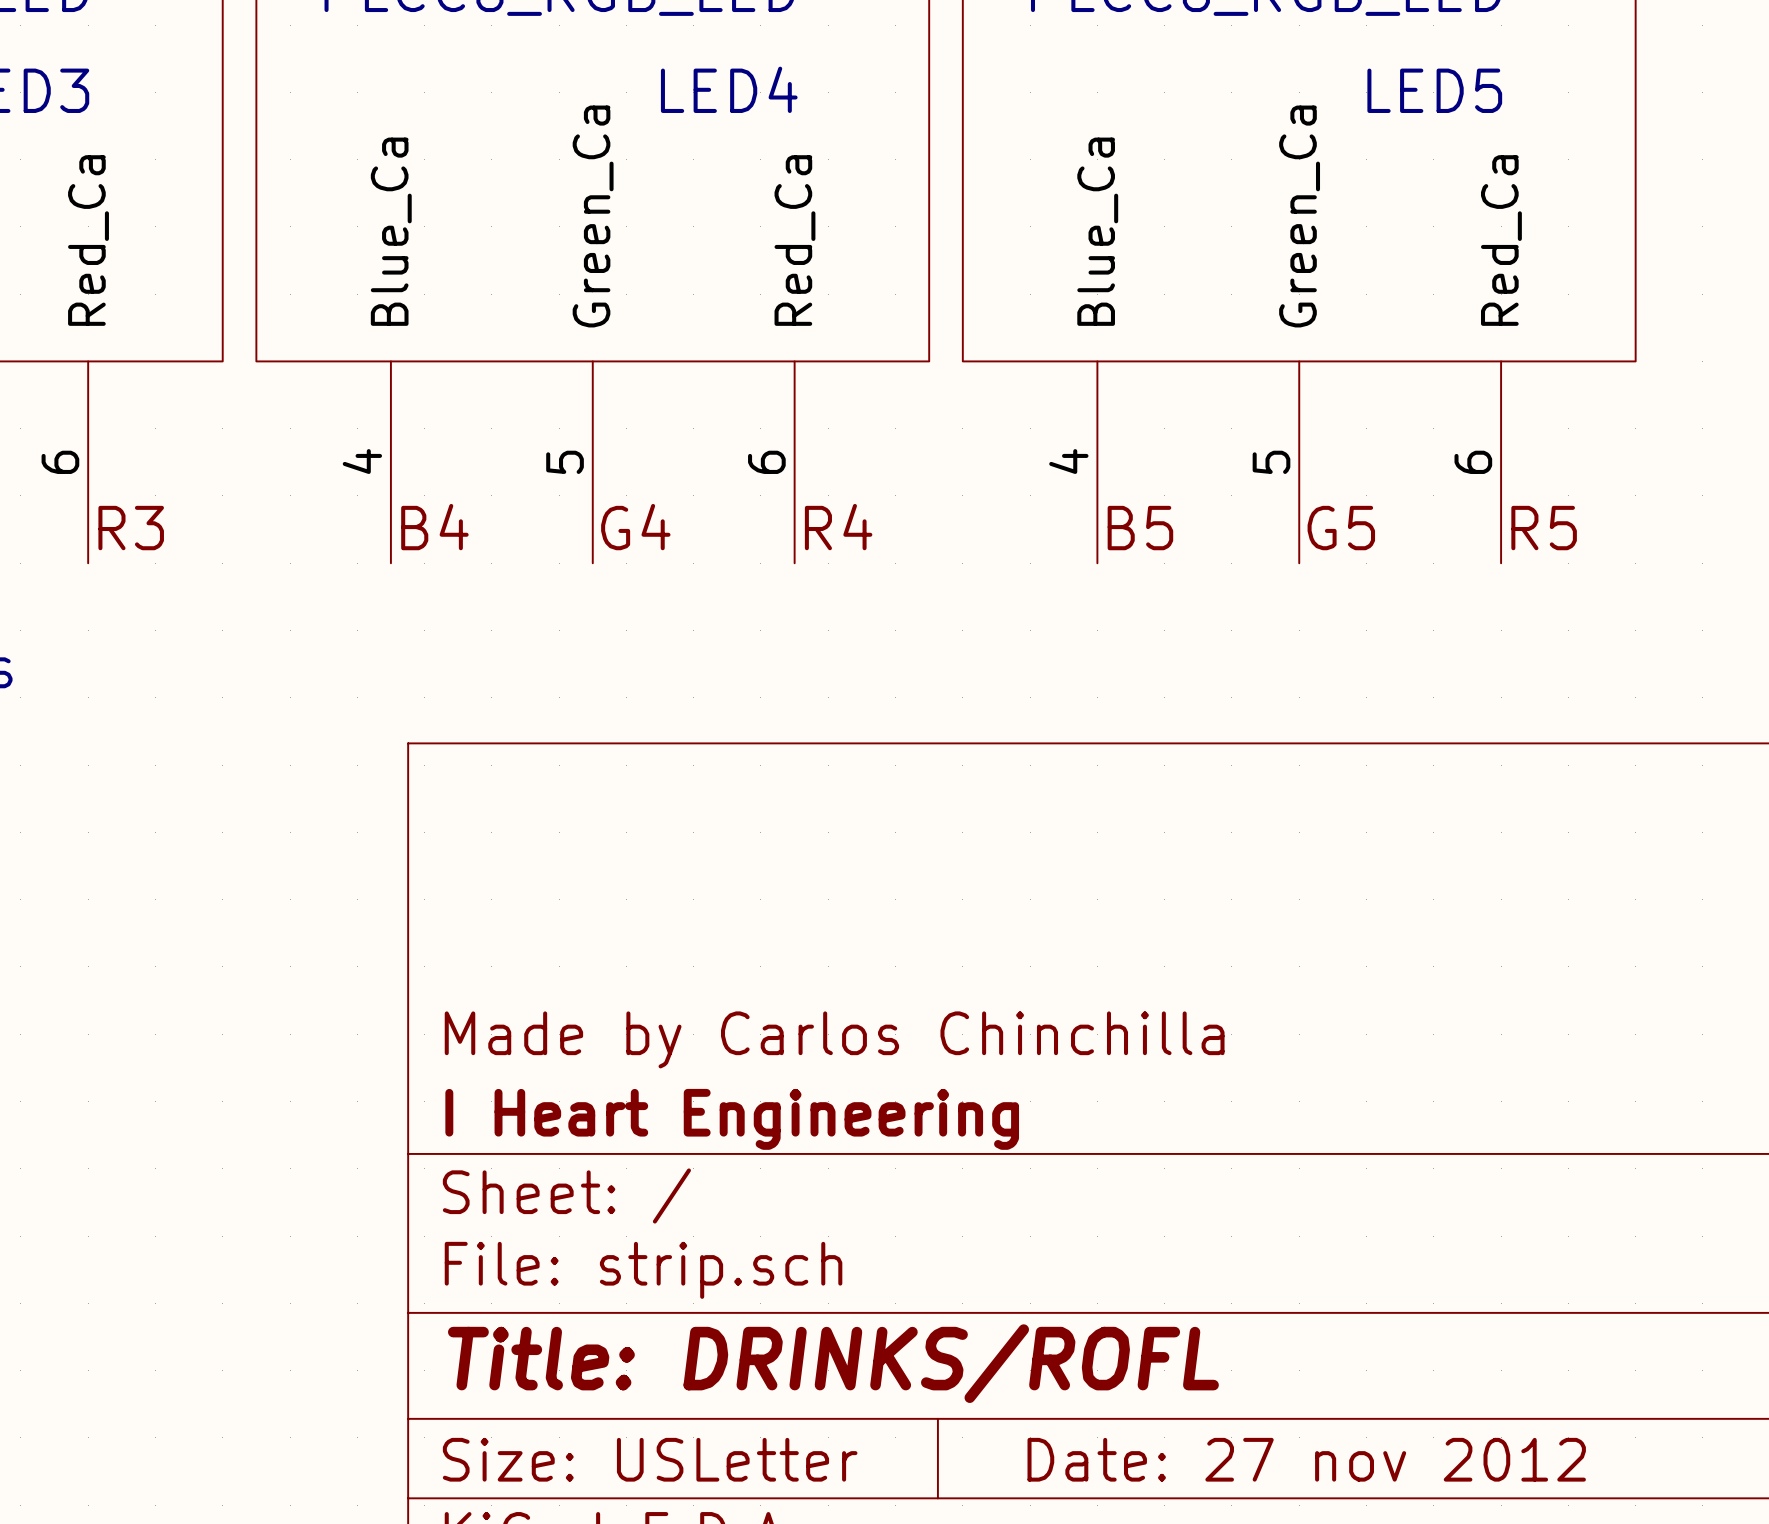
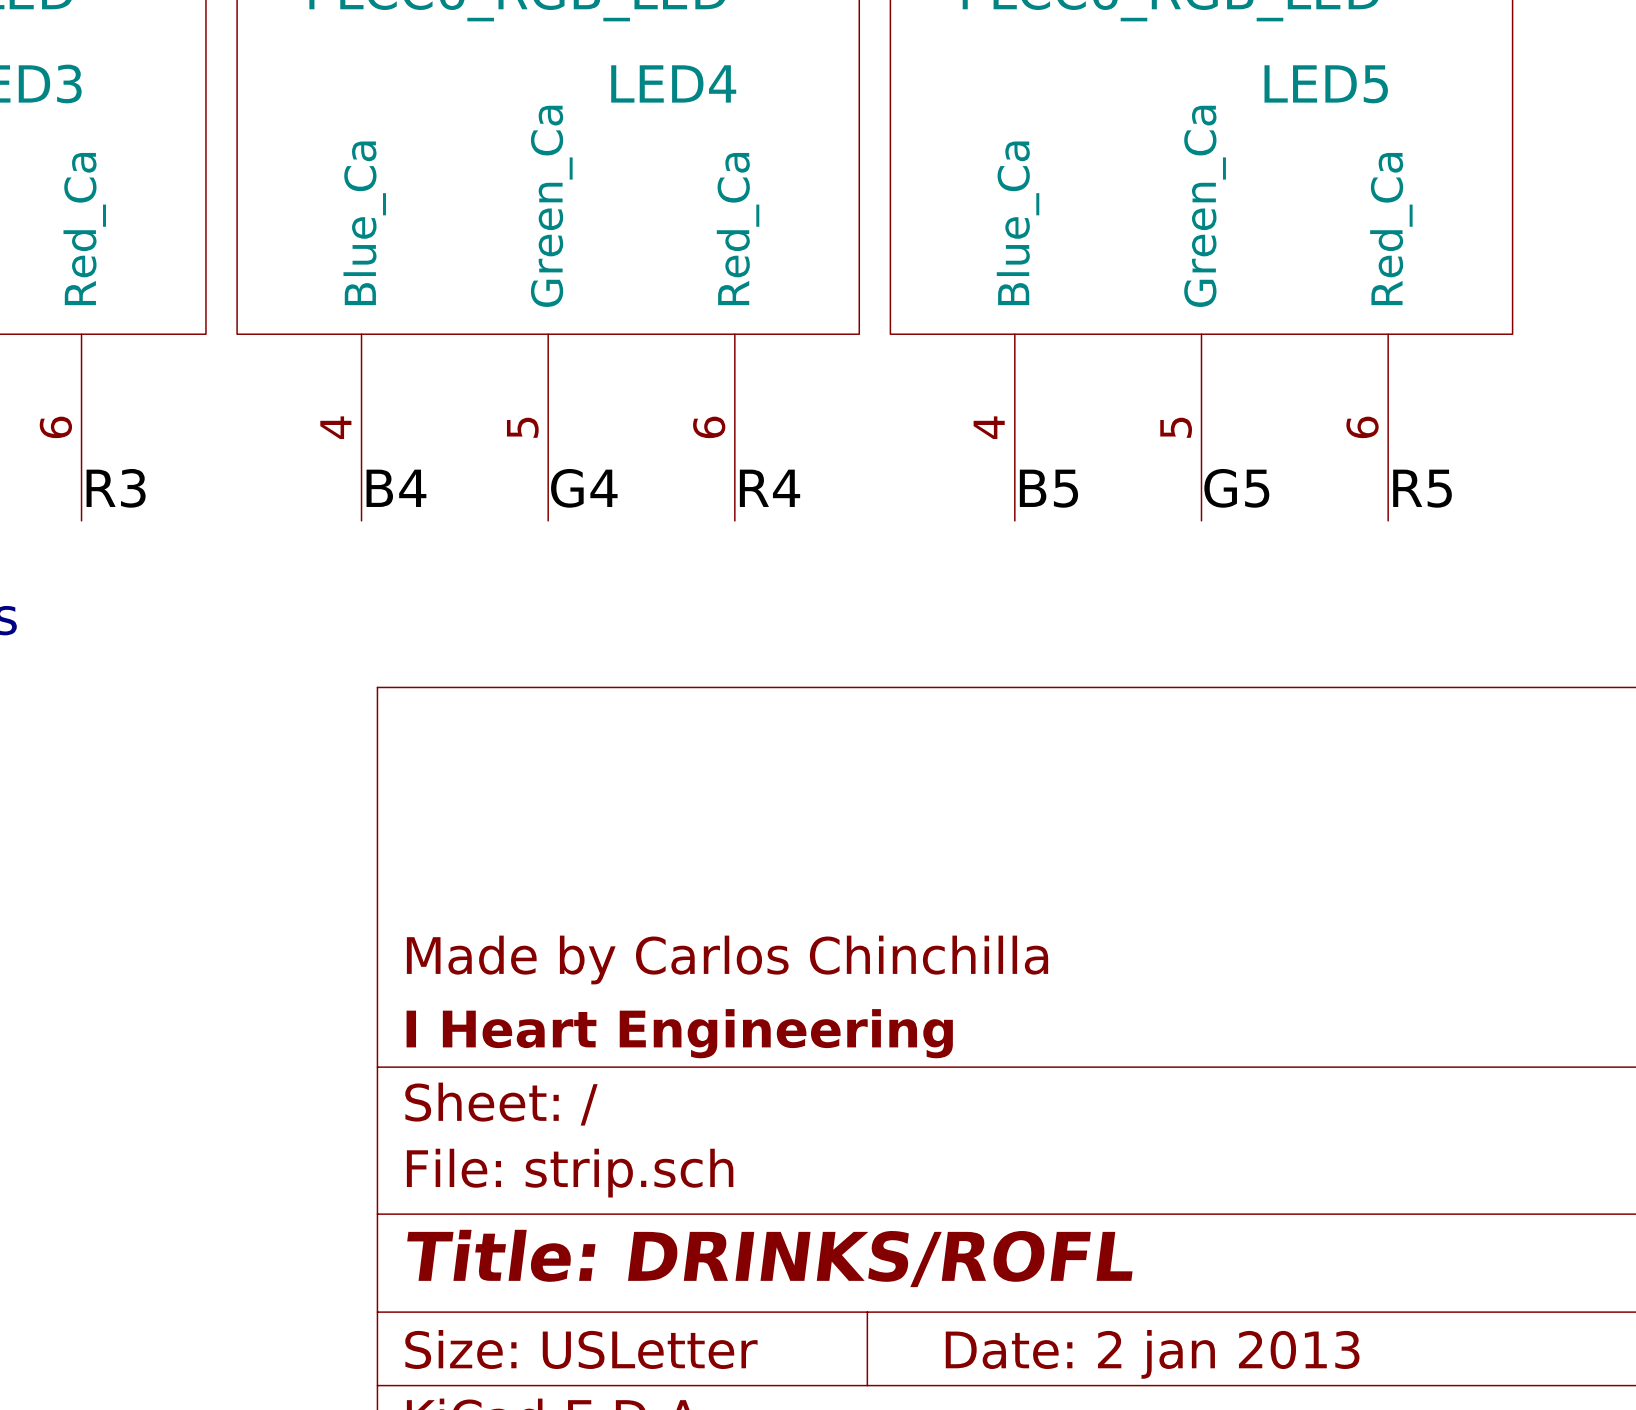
title block: Date: 27 nov 2012 (1306, 1459) -> Date: 2 jan 2013 (1152, 1354)

